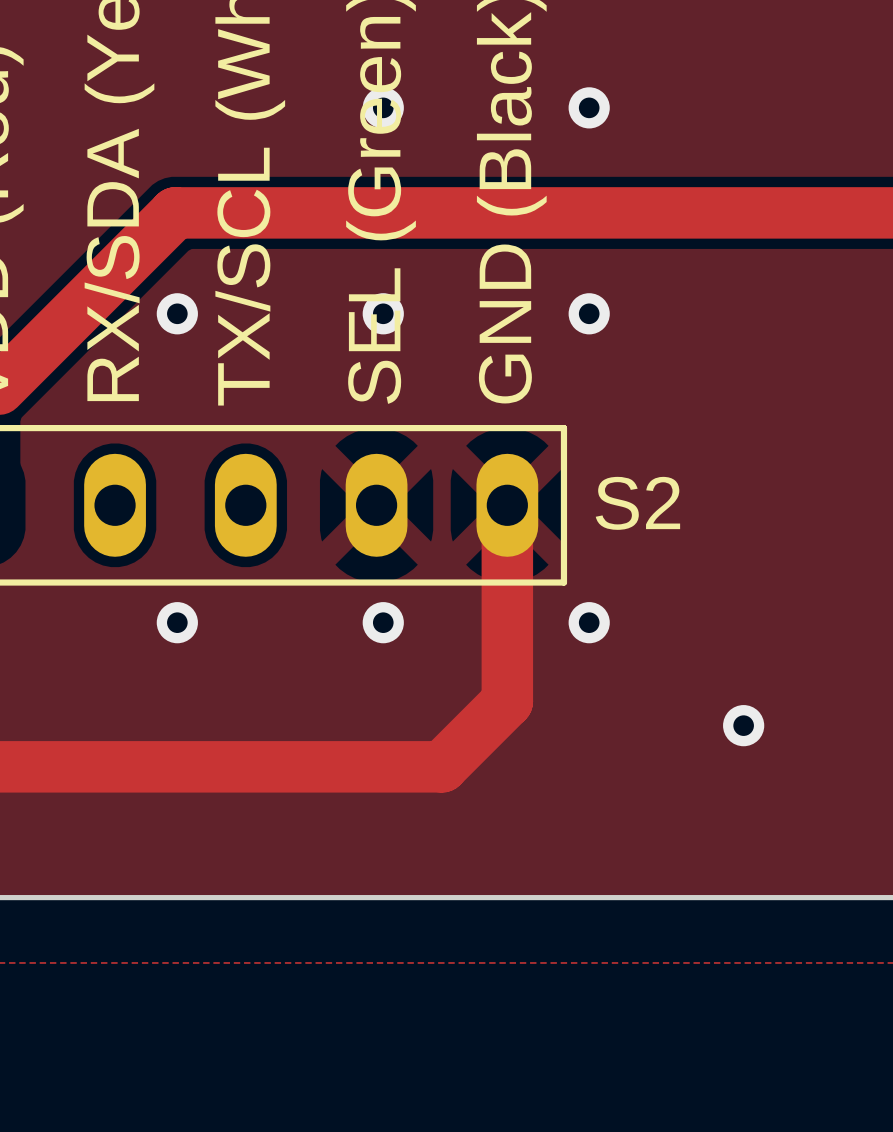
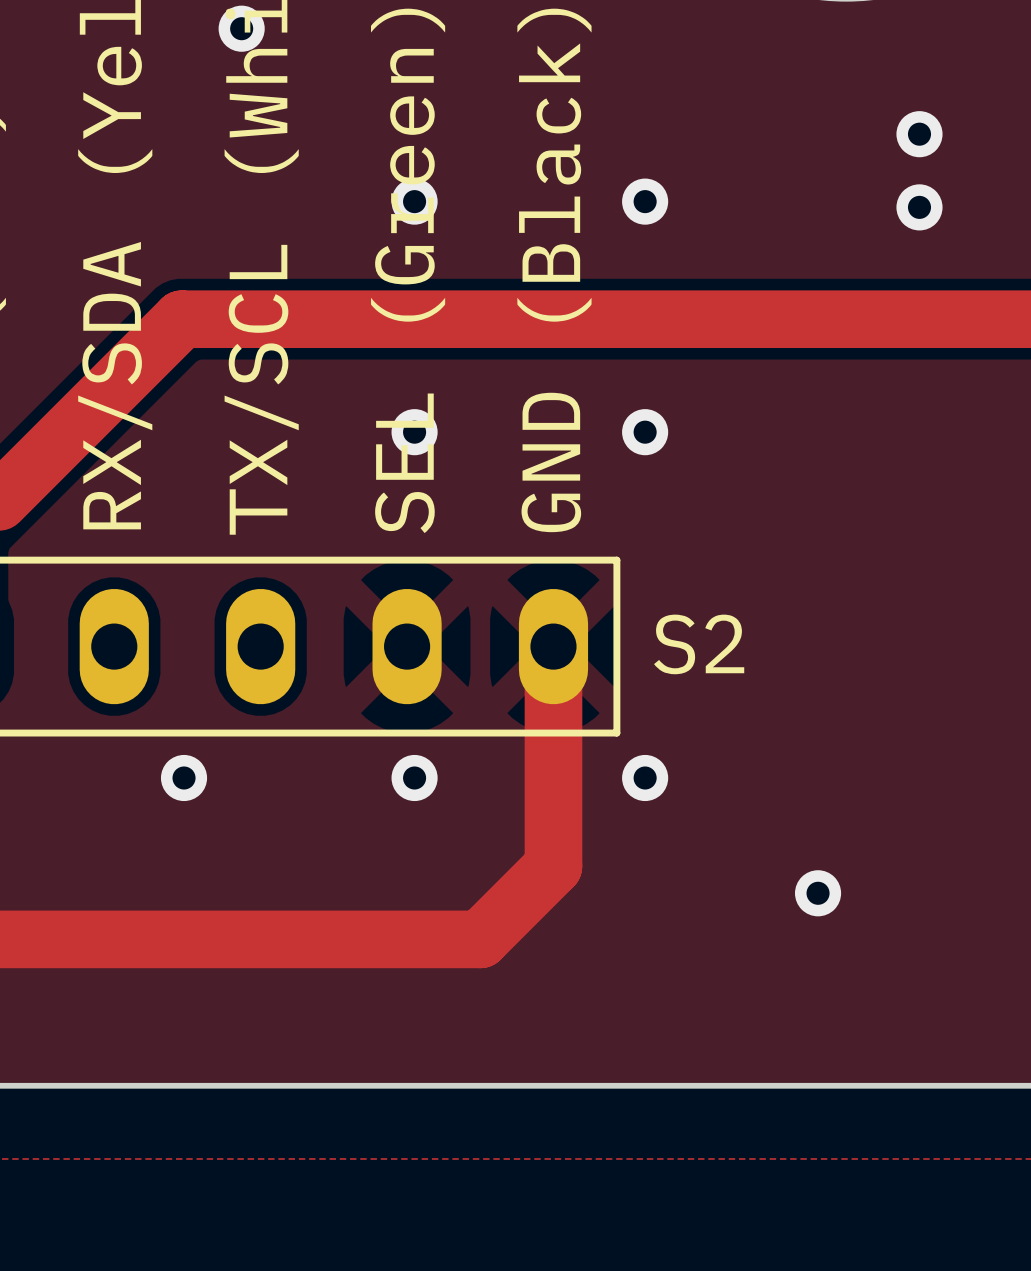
via: none -> (919, 134)
via: none -> (919, 207)
via: (177, 313) -> none

